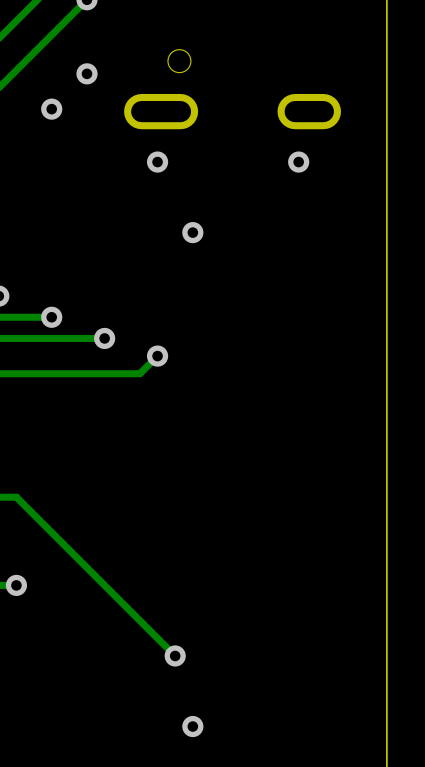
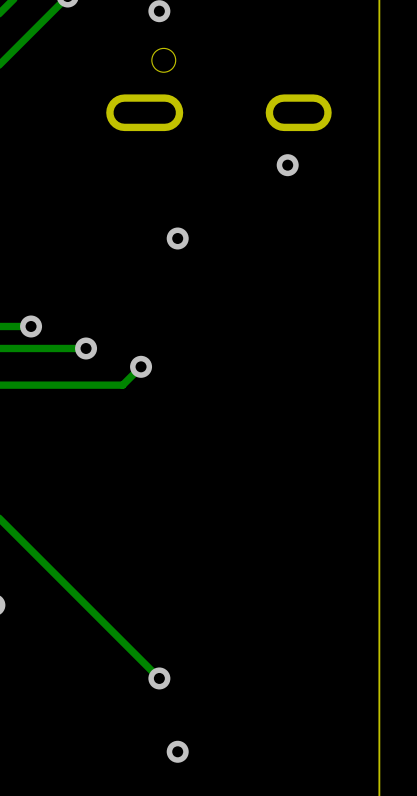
via: none -> (159, 11)
via: (87, 73) -> none
via: (51, 109) -> none
via: (157, 162) -> none

